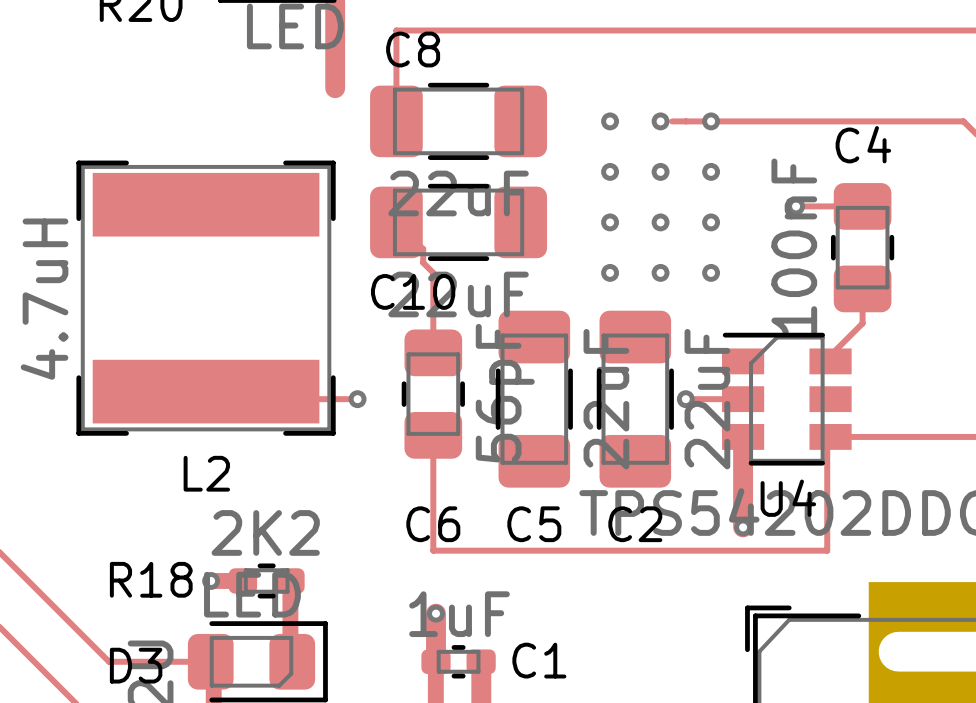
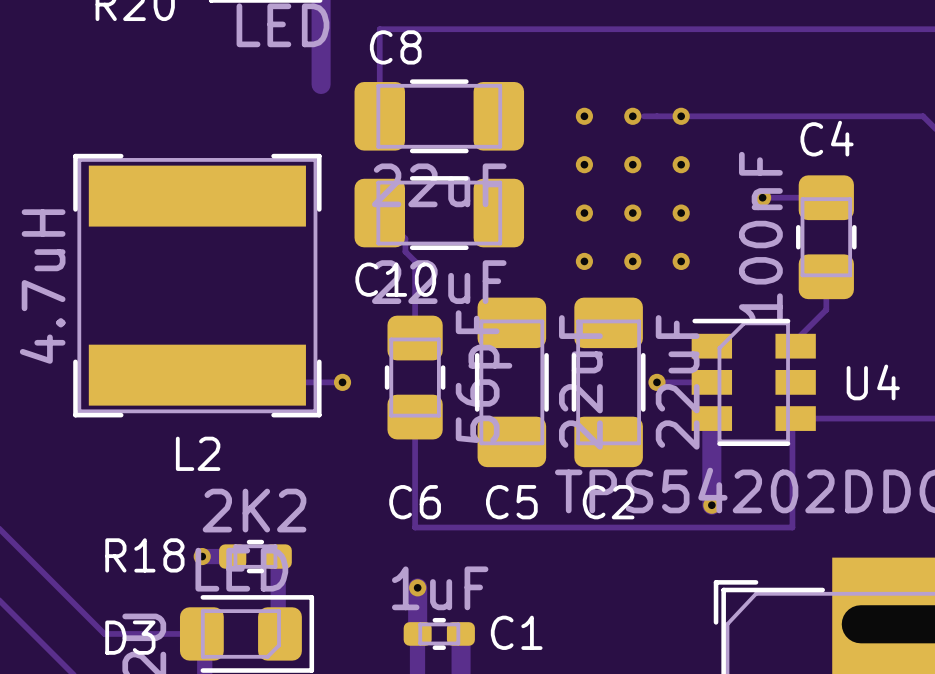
U4 name position: U4 (788, 498) -> U4 (873, 382)

